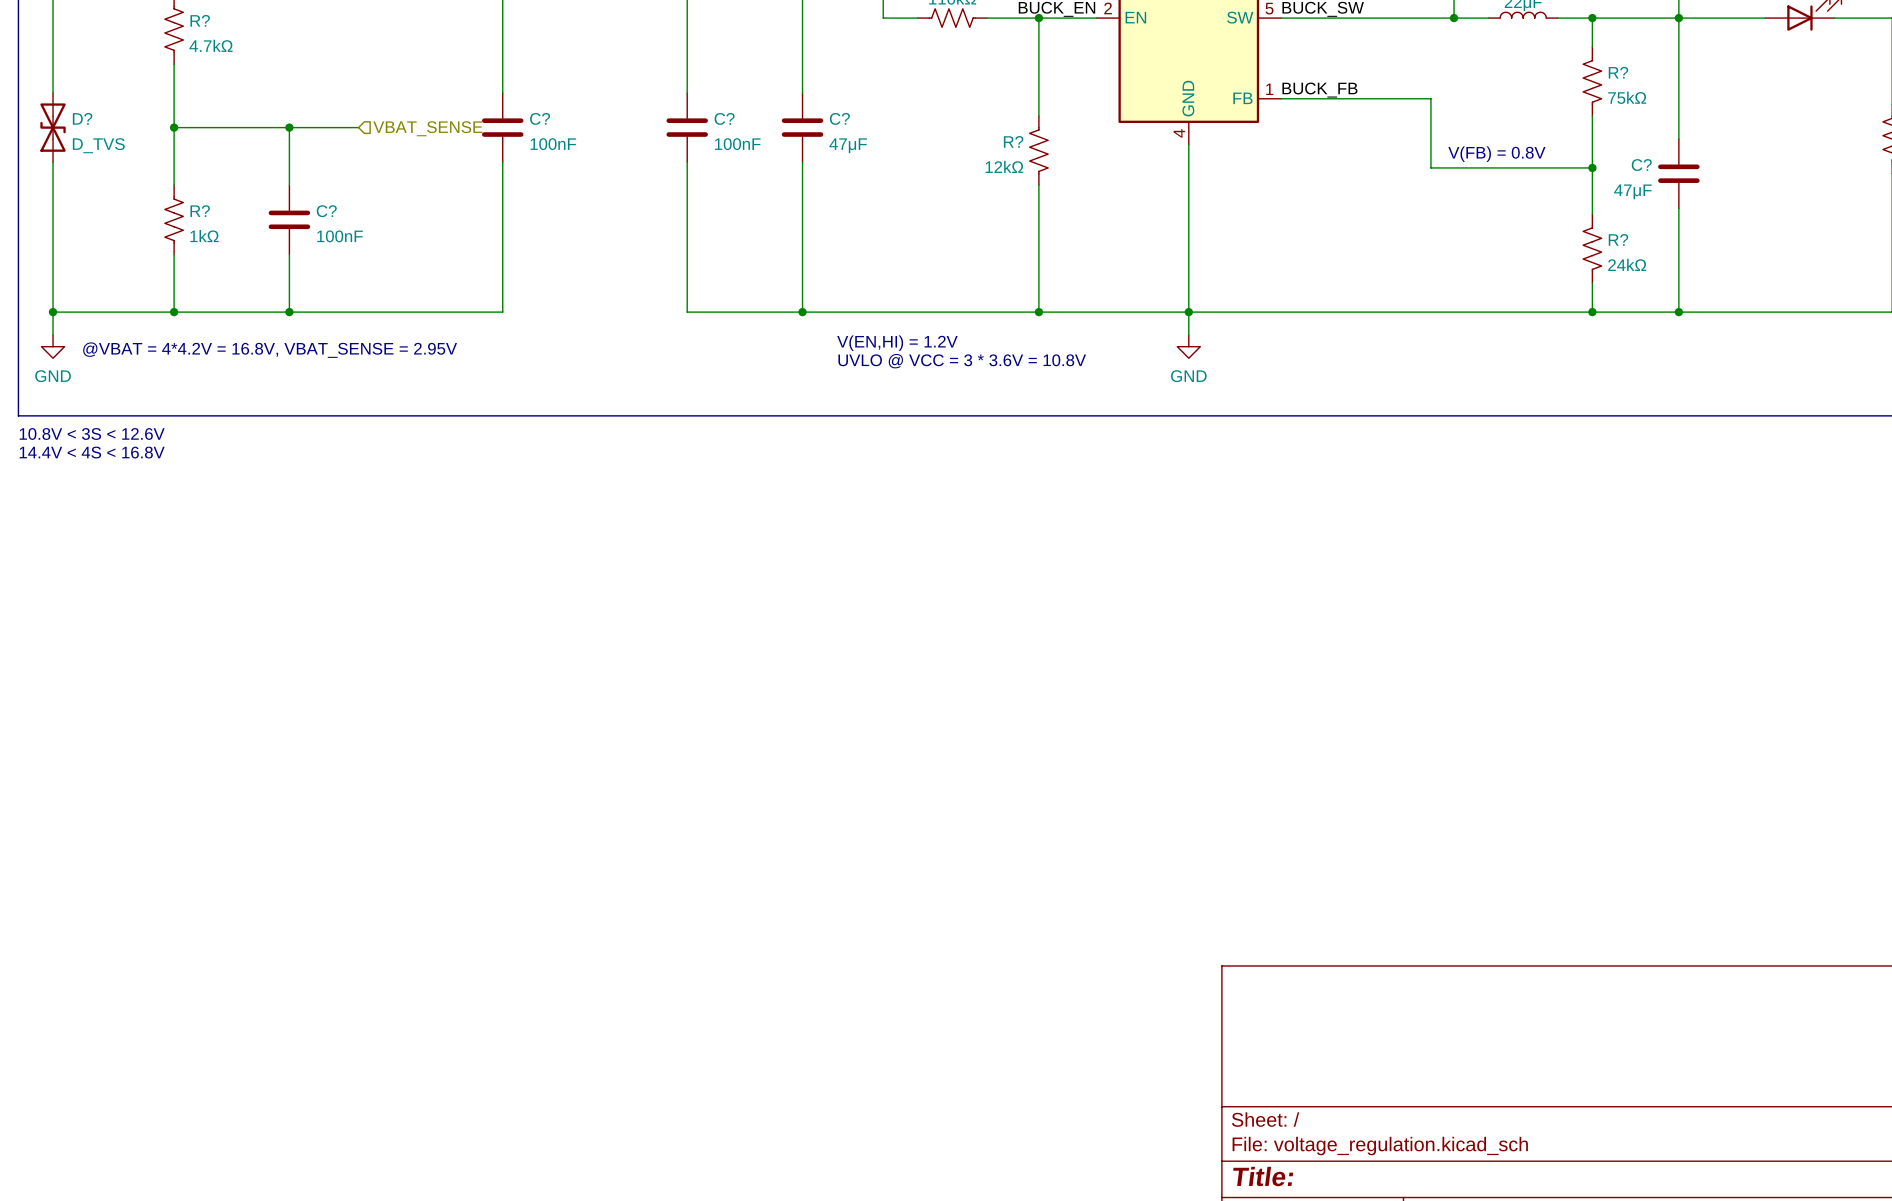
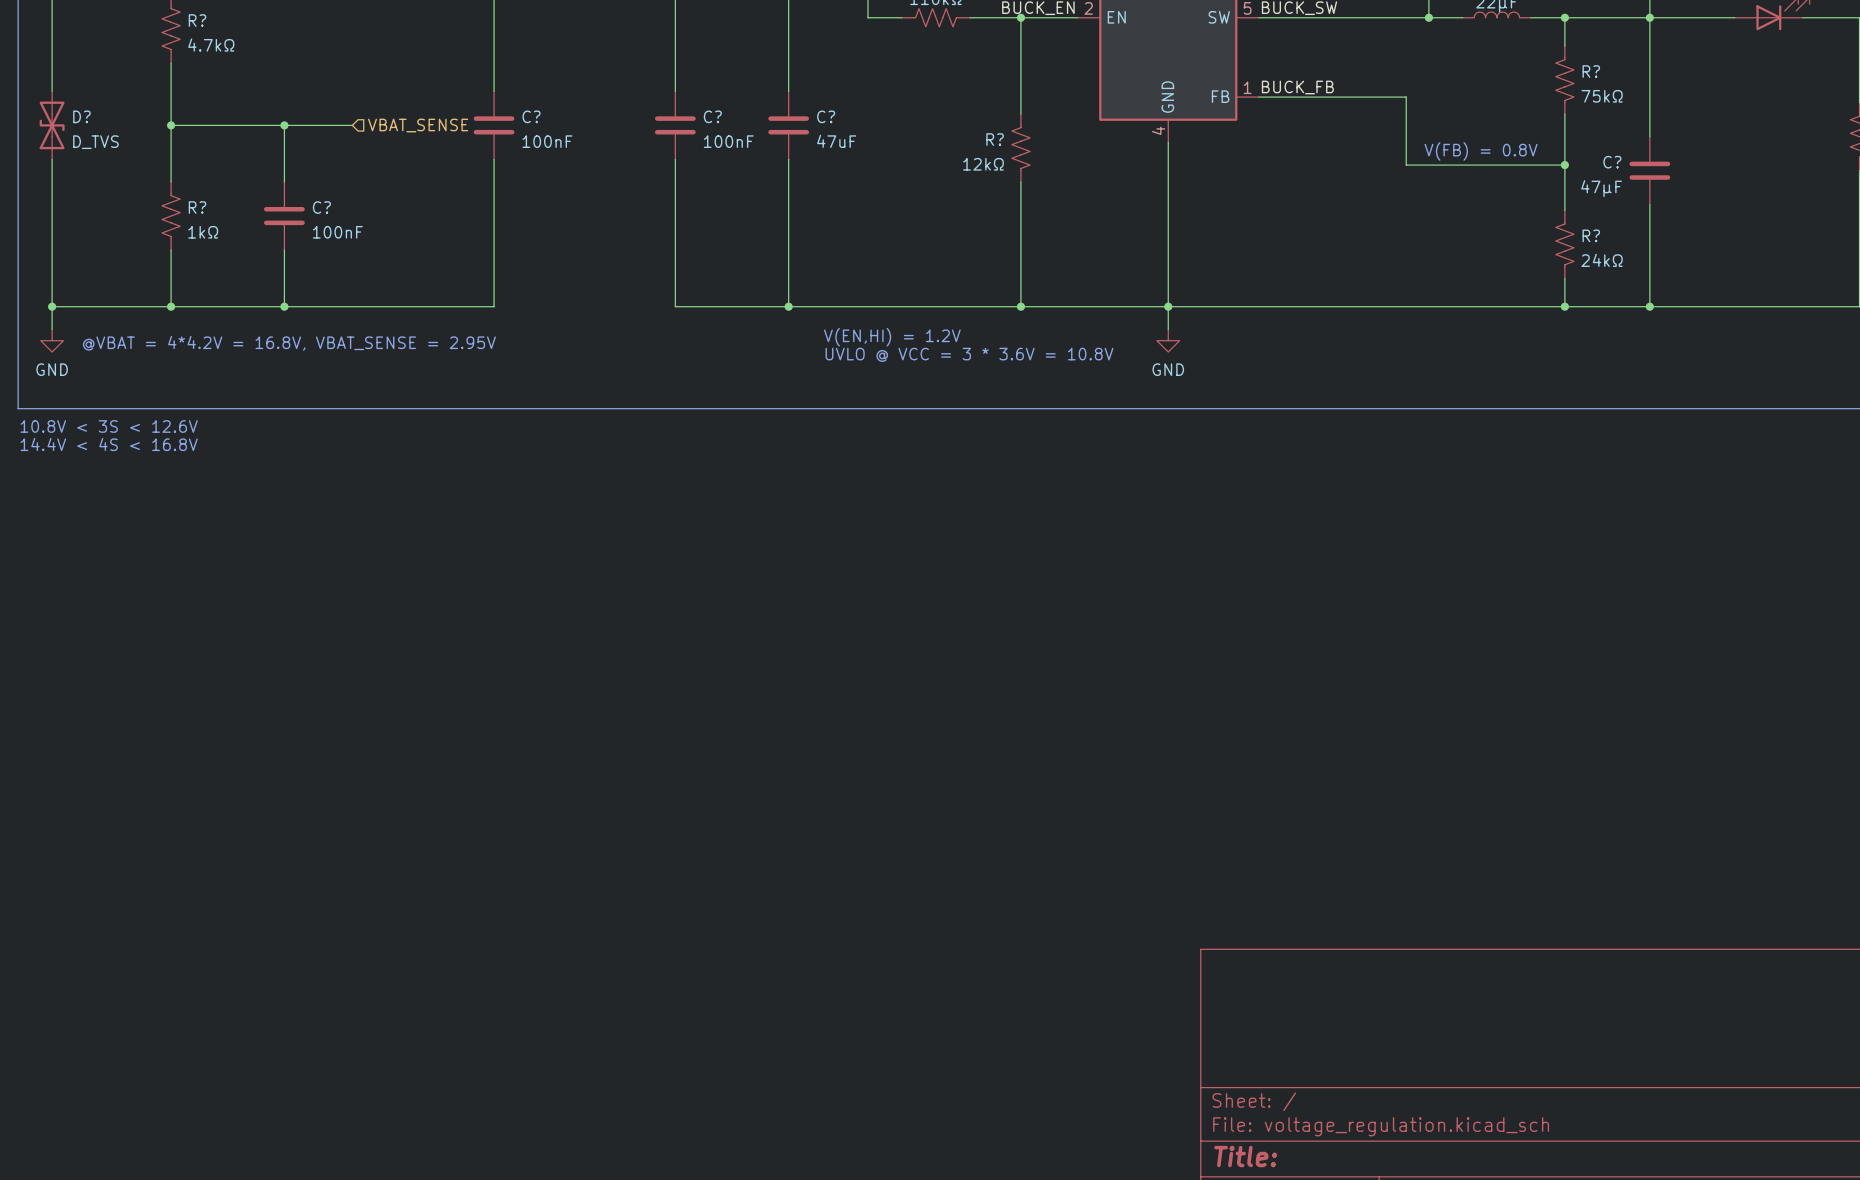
C? value: 47μF (848, 145) -> 47uF (836, 141)

